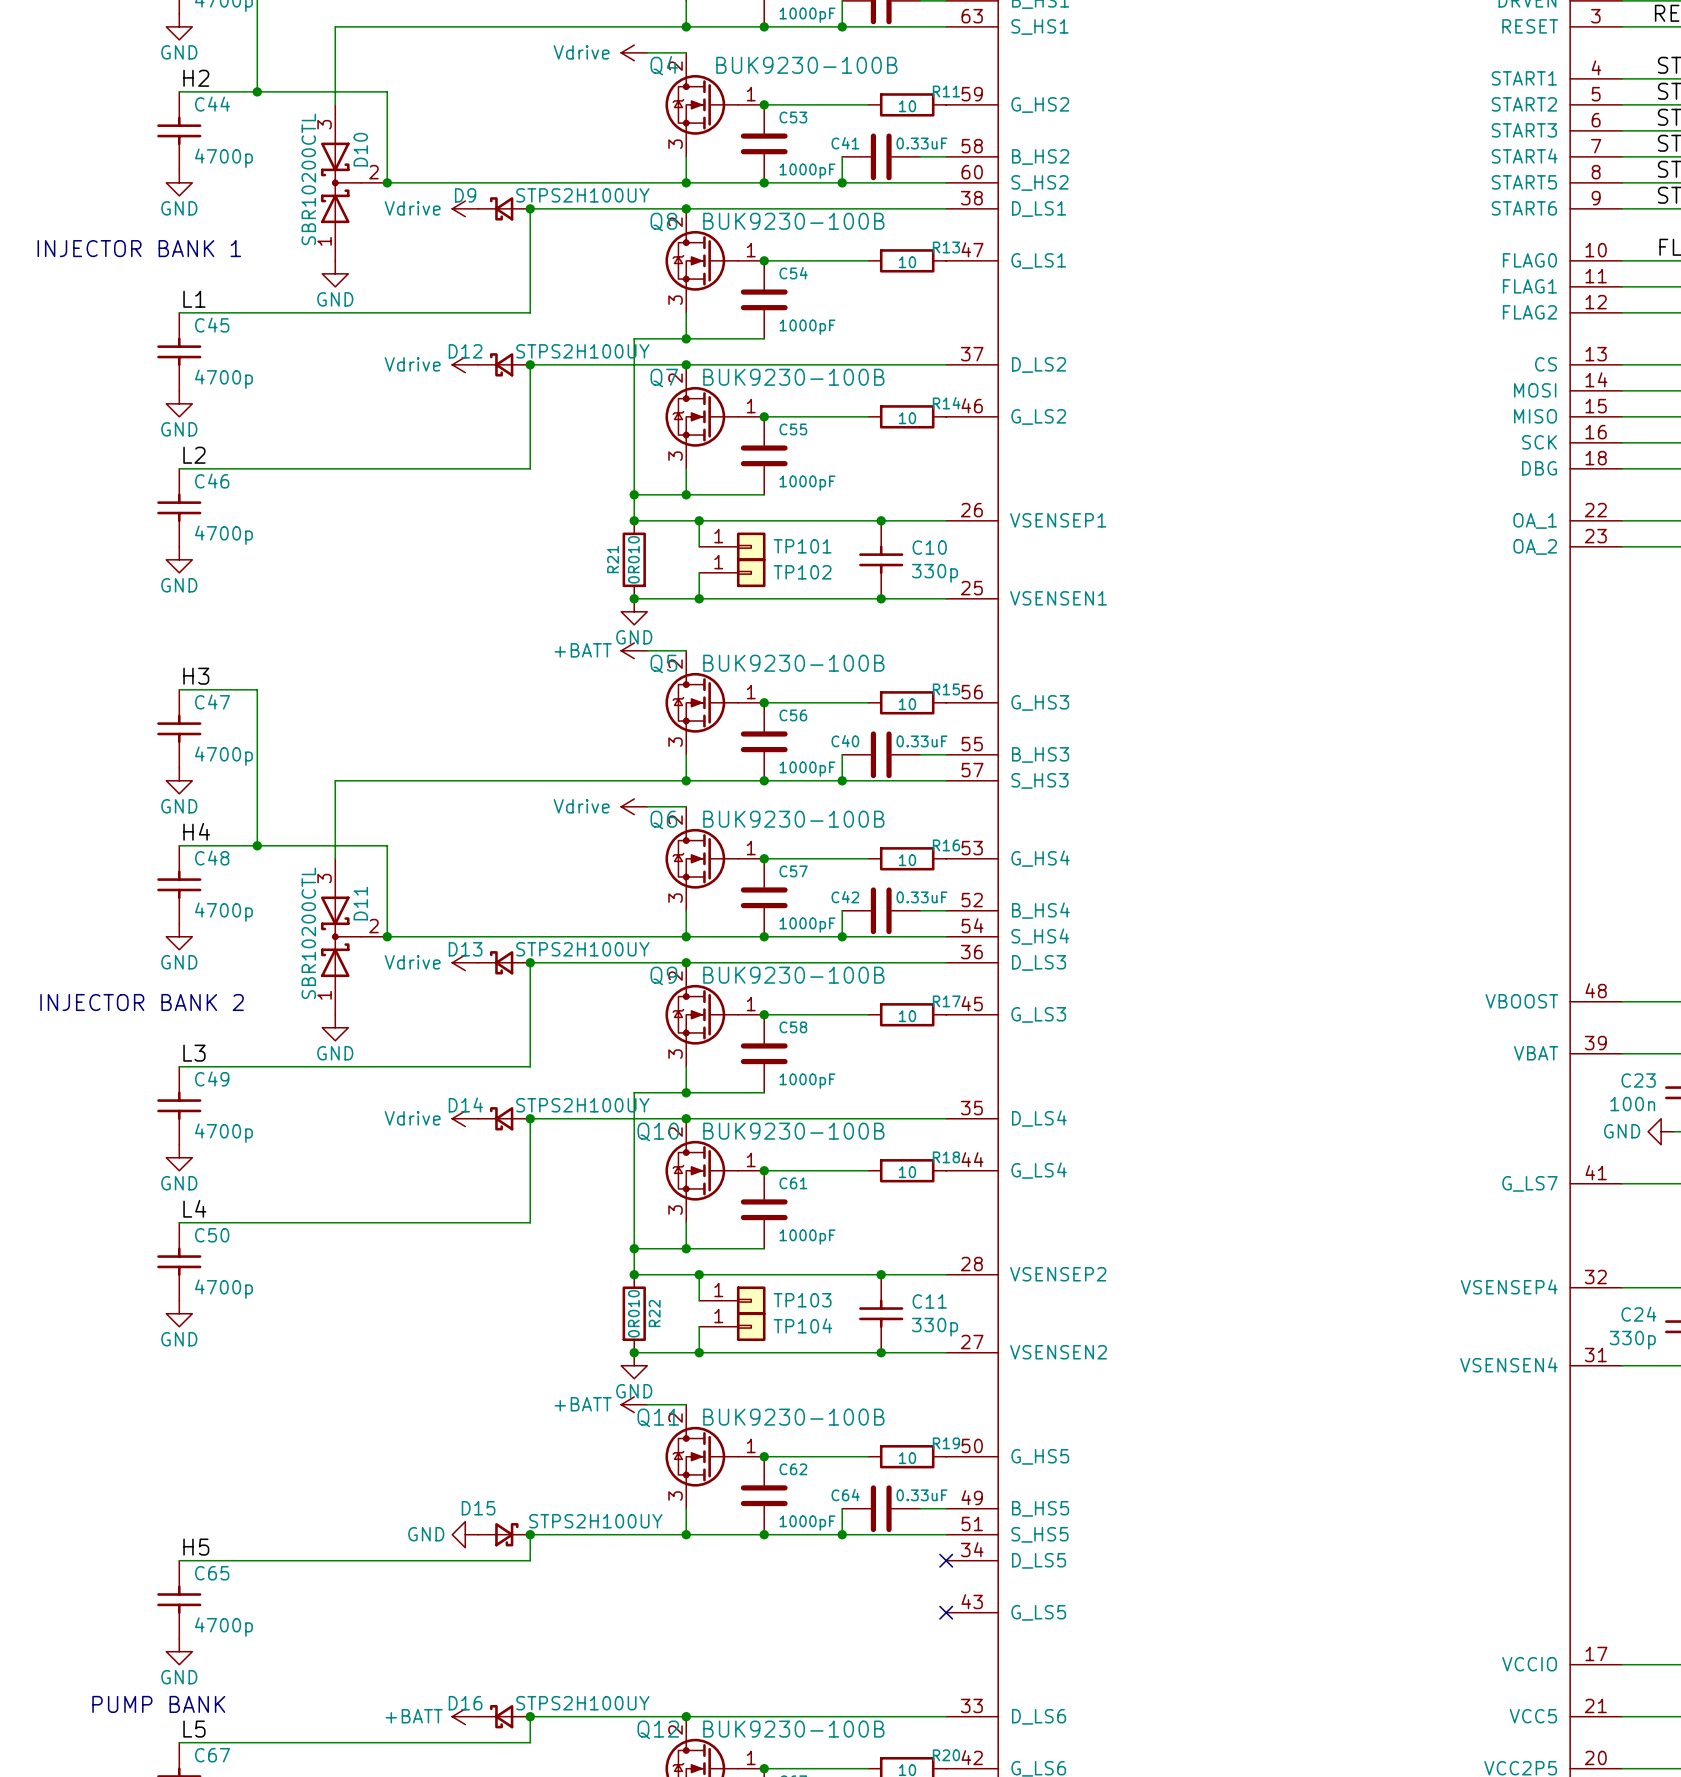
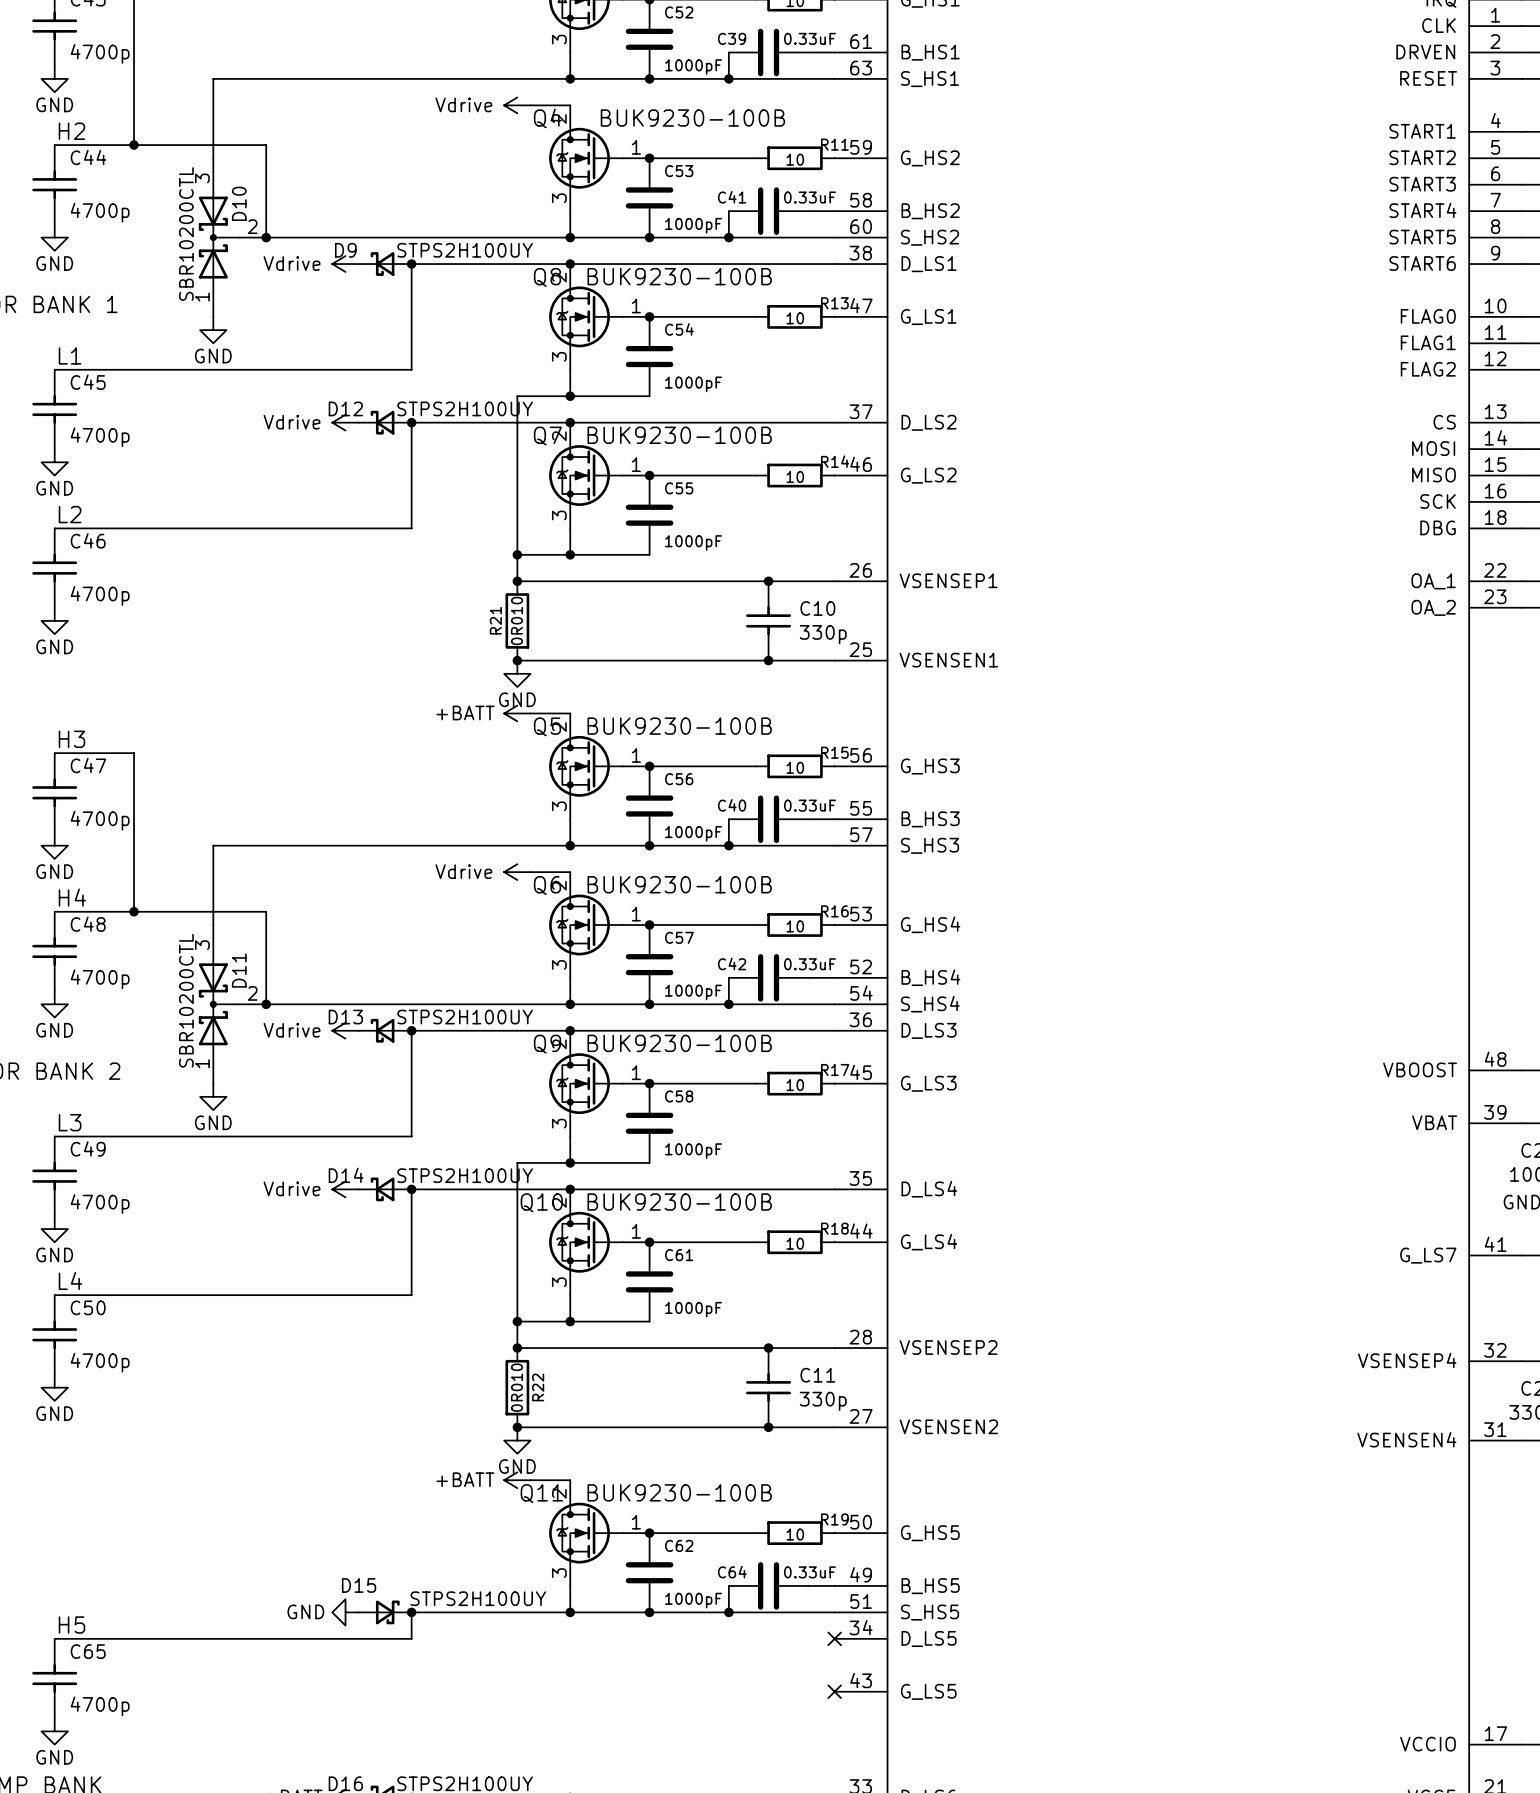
wire: (699, 520) (699, 546) -> none
junction: (699, 520) -> none
TP101: (732, 546) -> none
wire: (699, 572) (699, 598) -> none
TP102: (732, 572) -> none
junction: (699, 598) -> none
wire: (699, 1274) (699, 1300) -> none
junction: (699, 1274) -> none
TP103: (732, 1300) -> none
wire: (699, 1326) (699, 1352) -> none
TP104: (732, 1326) -> none
junction: (699, 1352) -> none

